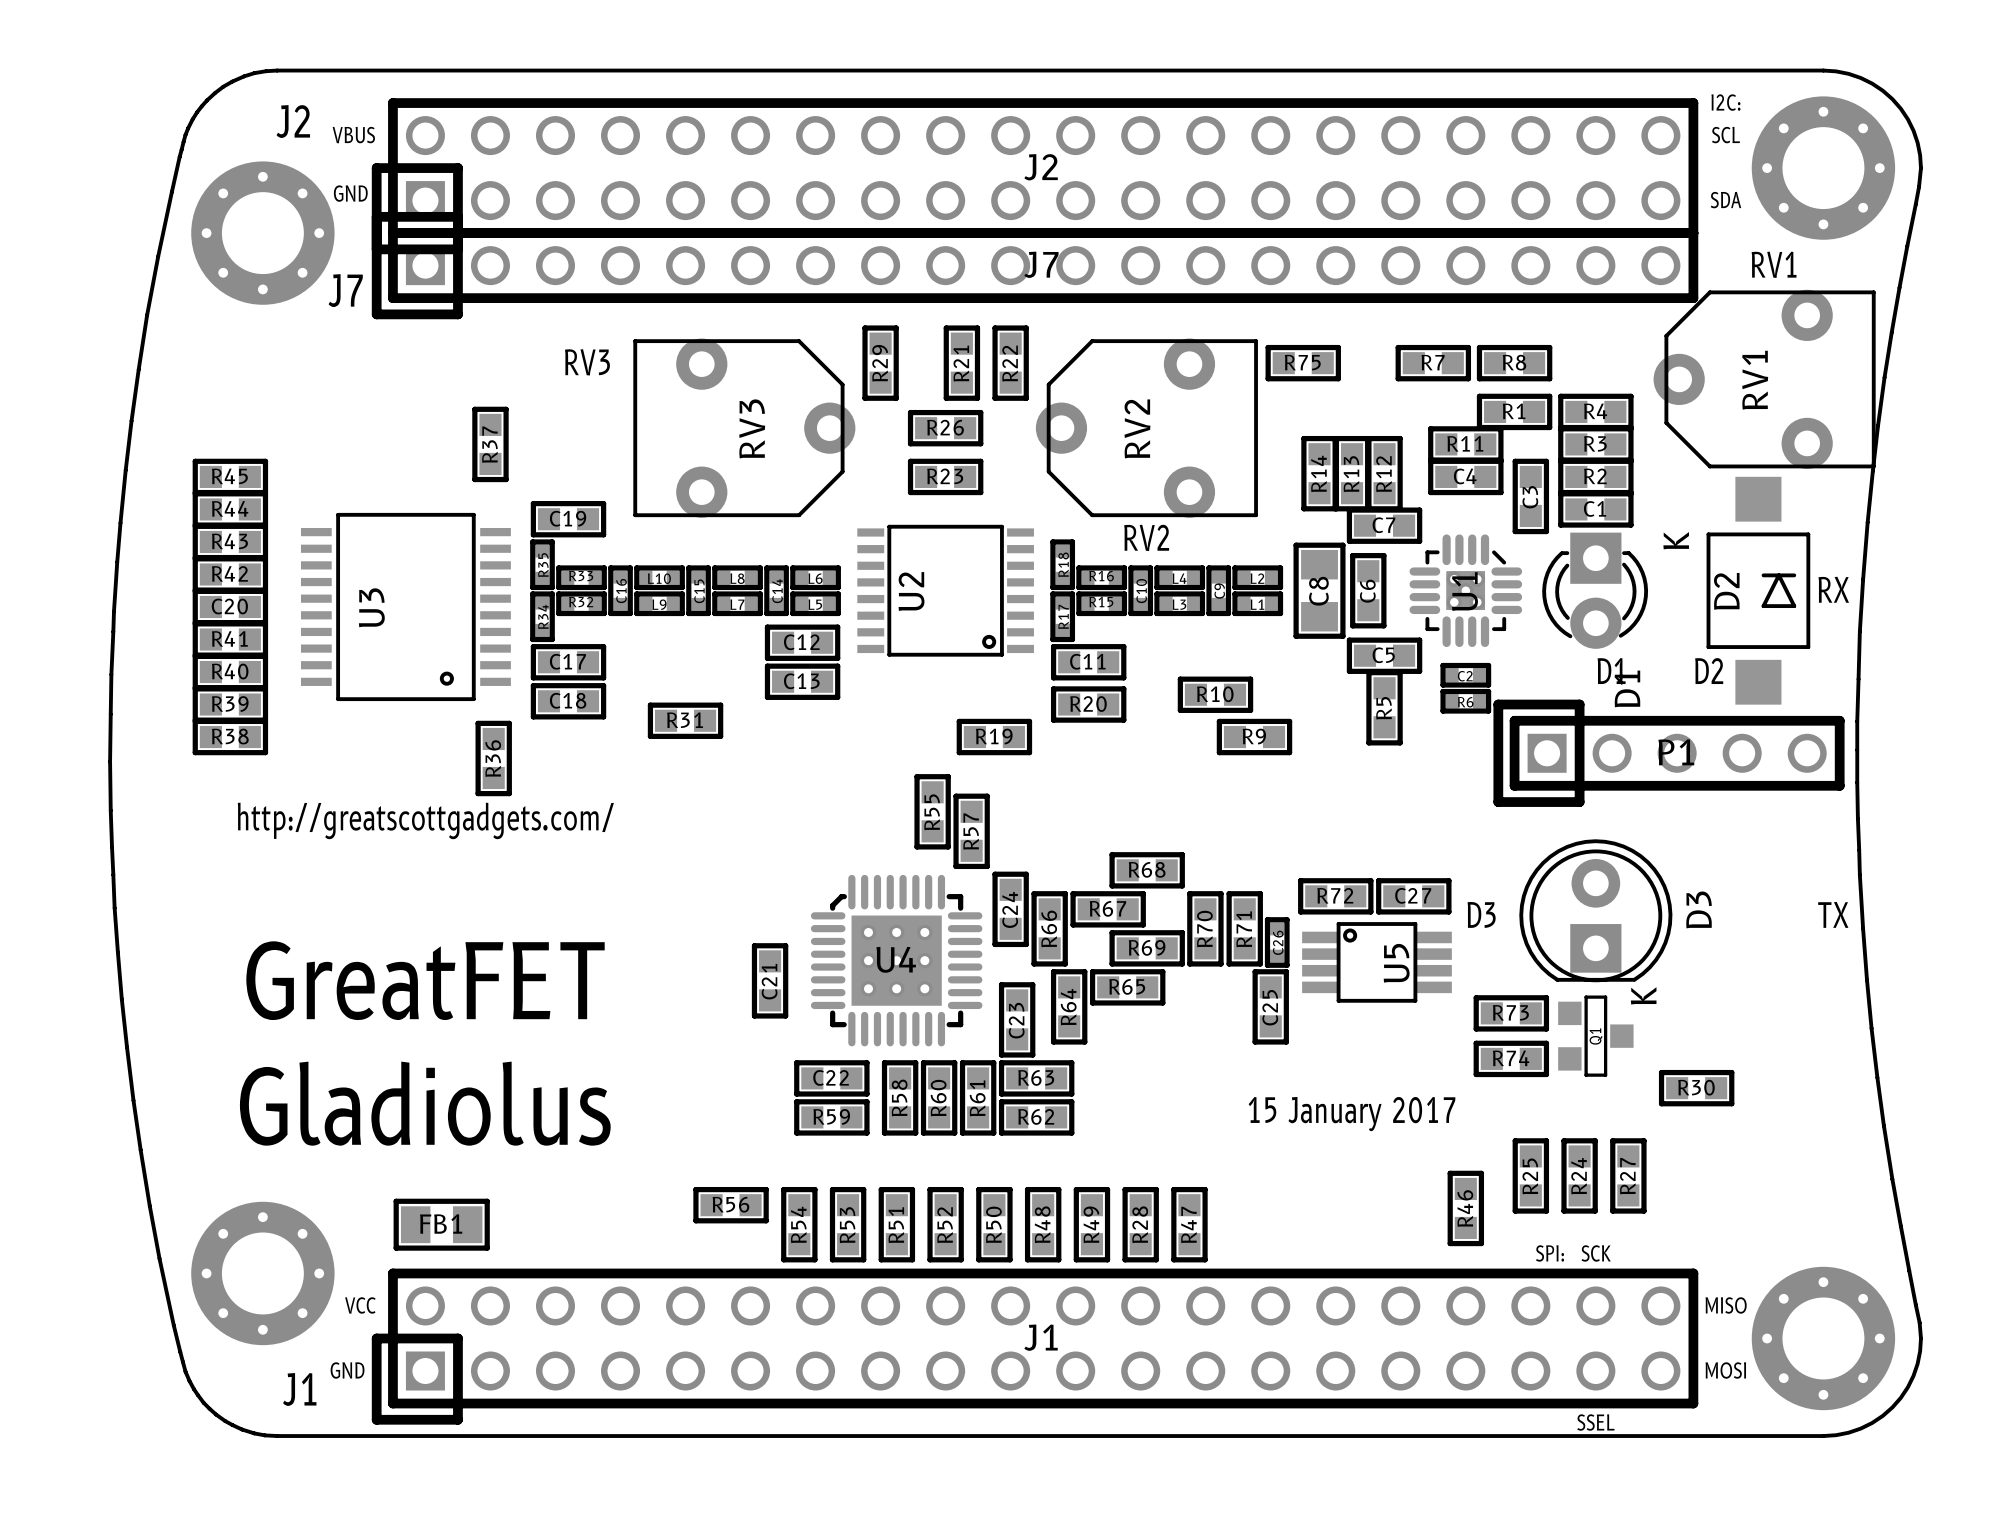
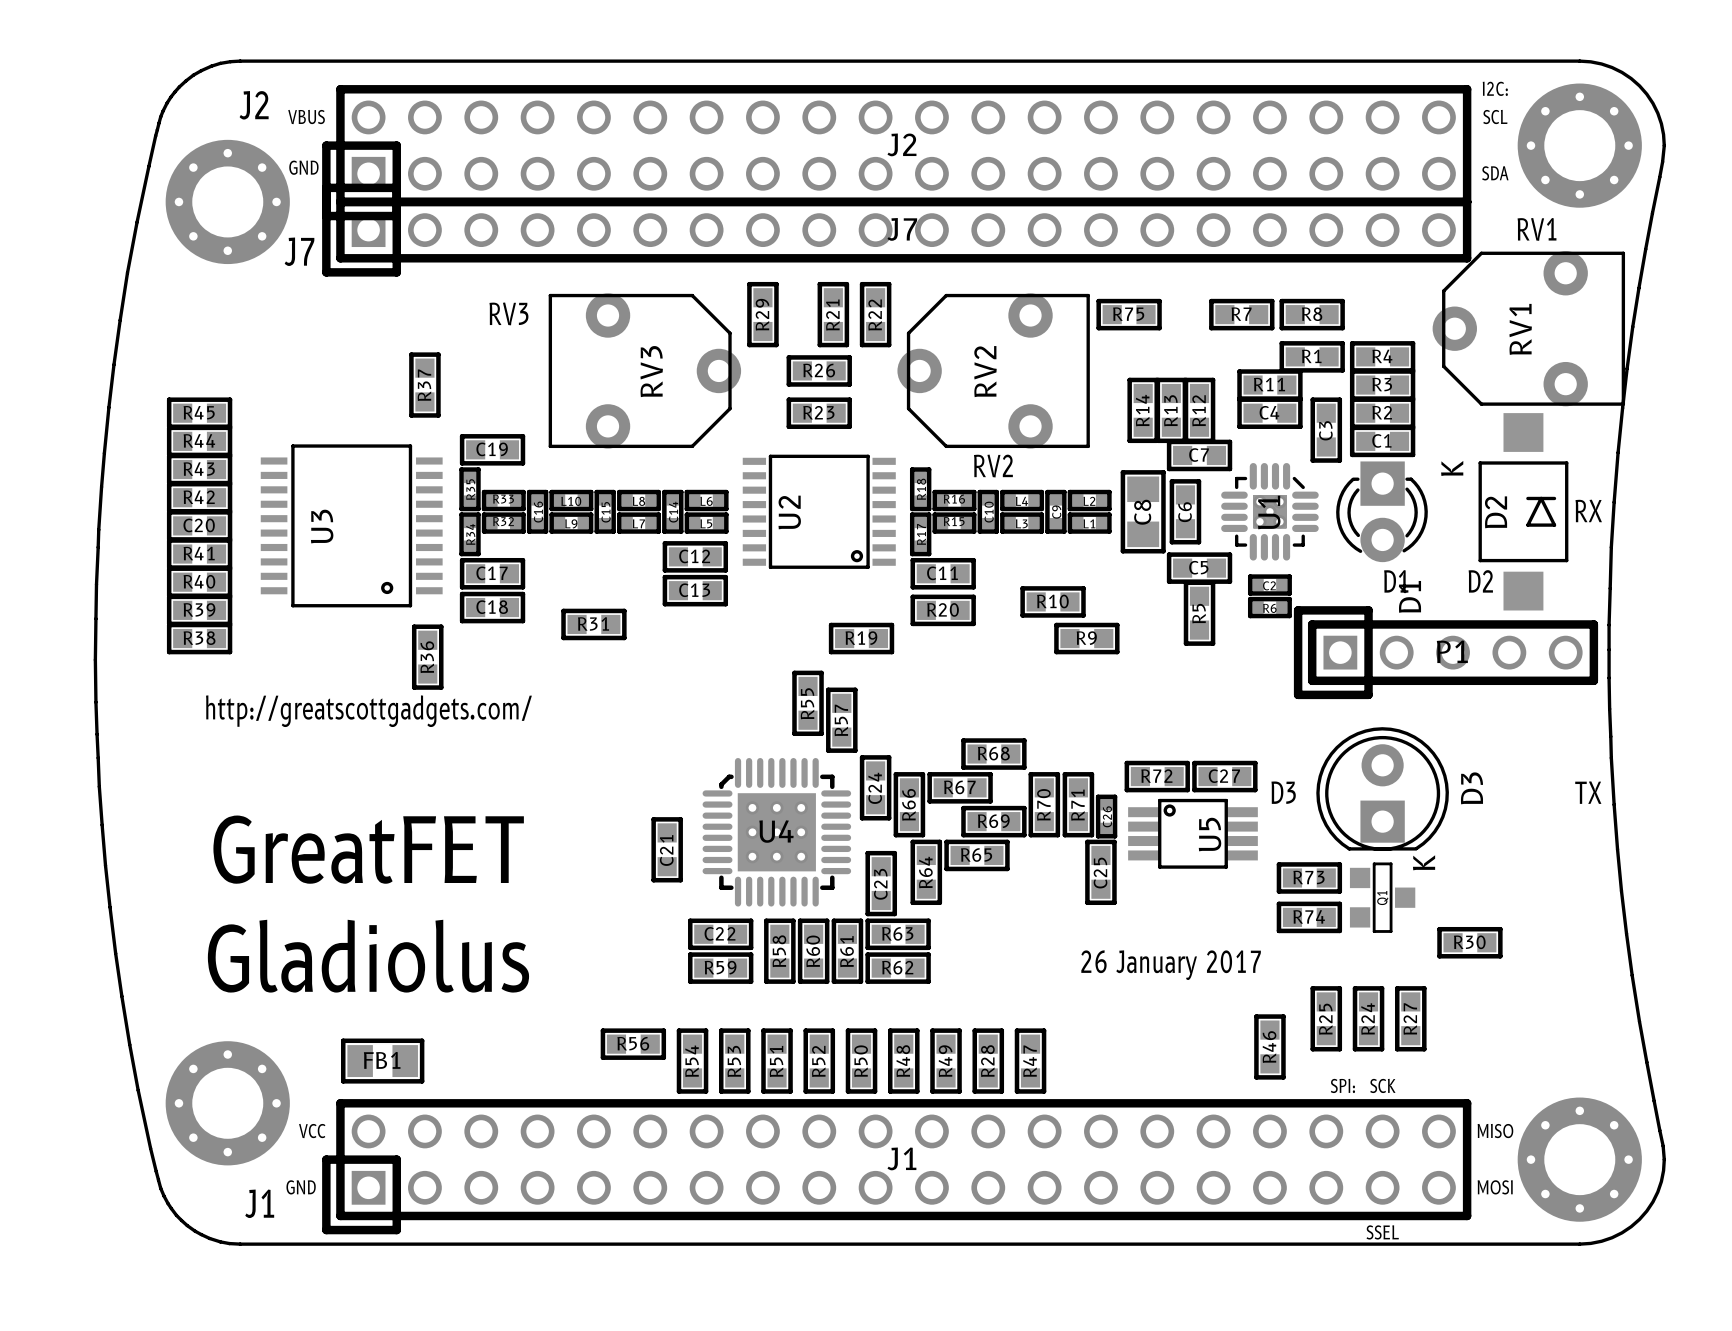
text: 15 January 2017 (1352, 1114) -> 26 January 2017 (1171, 965)

